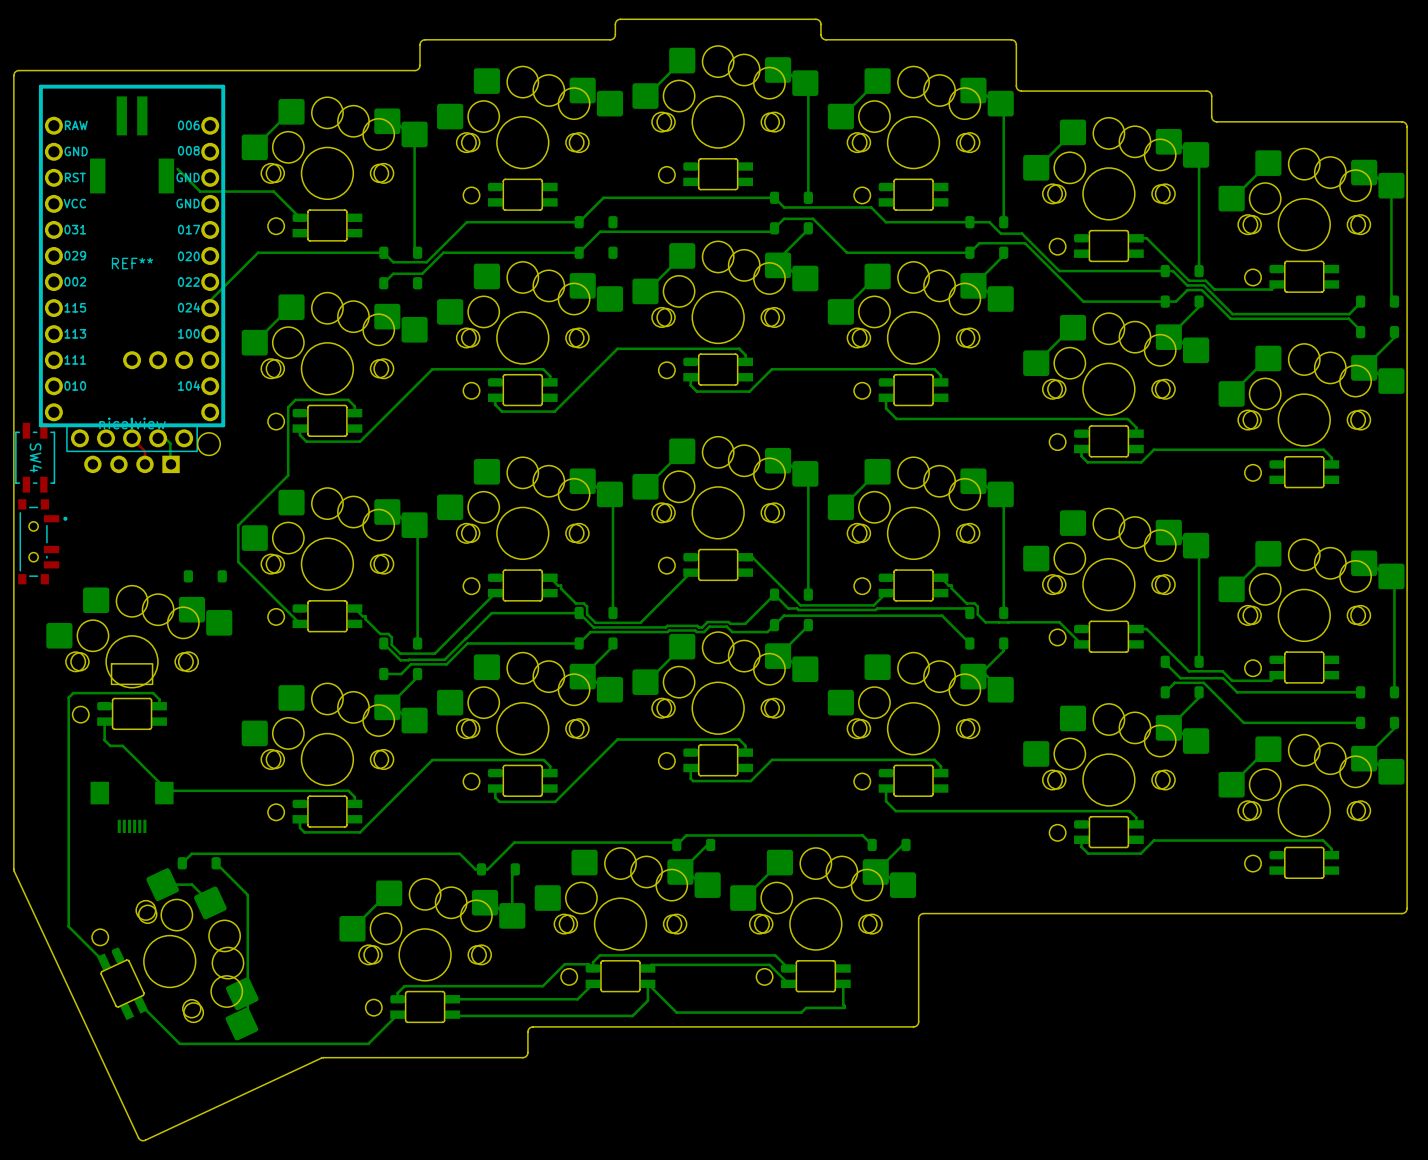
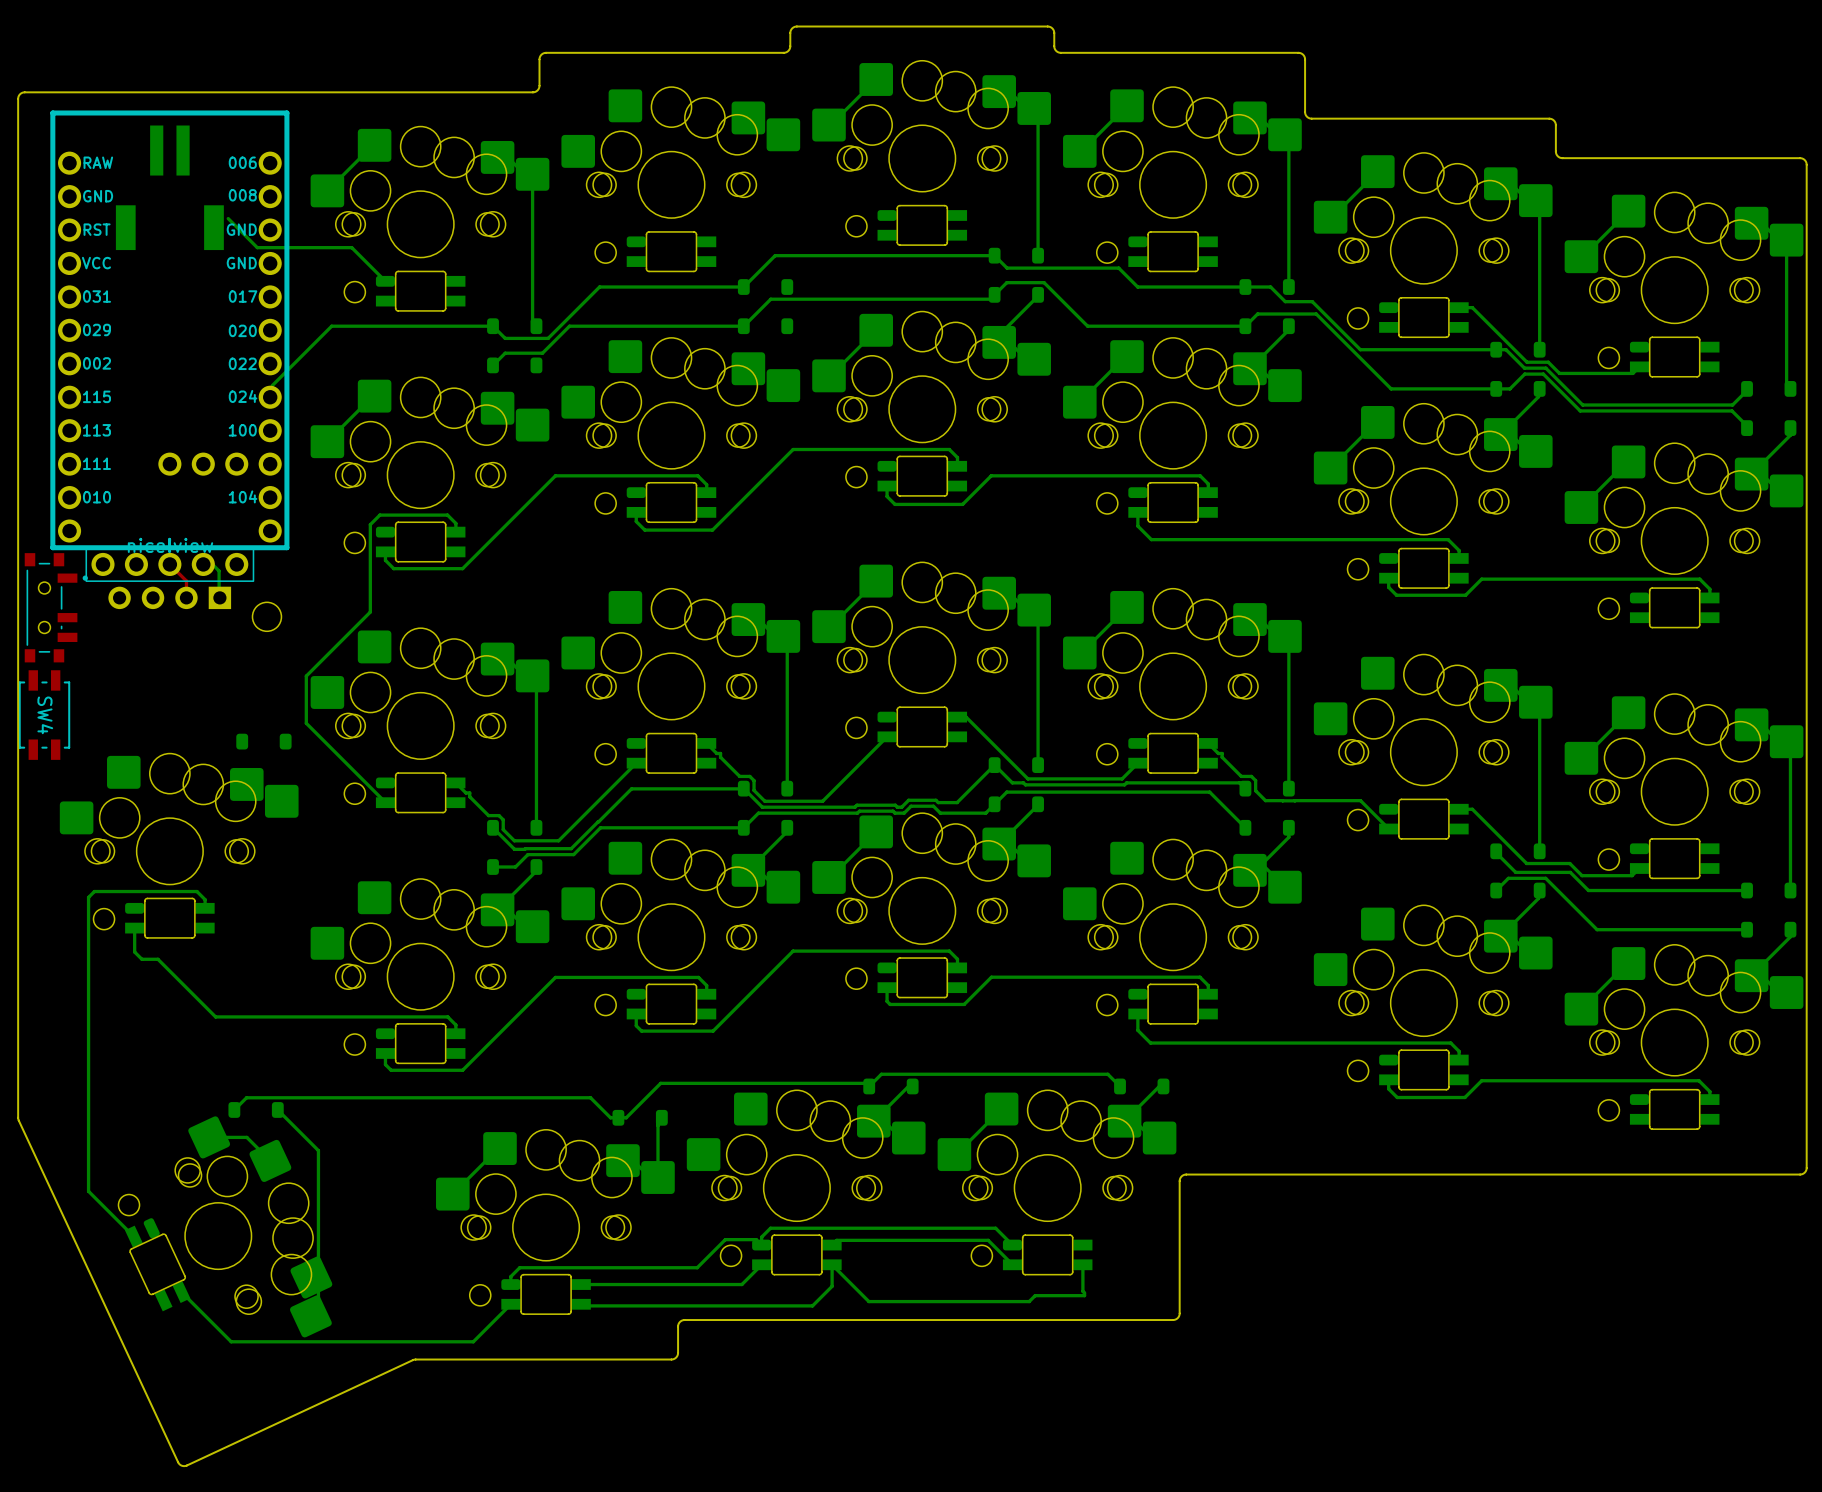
drawing position: (208, 444) -> (266, 616)
SW4 position: (35, 457) -> (44, 715)
part position: (42, 541) -> (56, 607)
REF**: (132, 674) -> none
part: (132, 807) -> none

